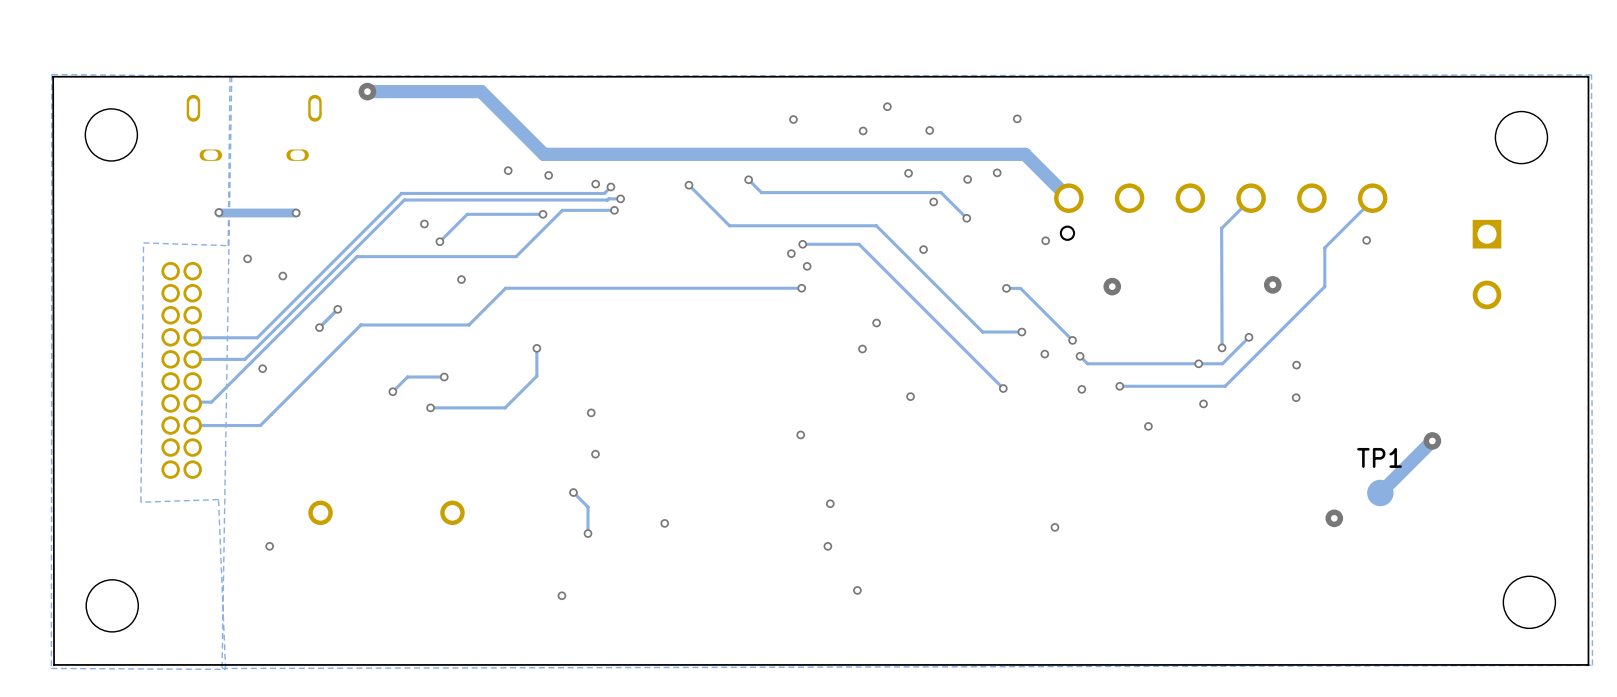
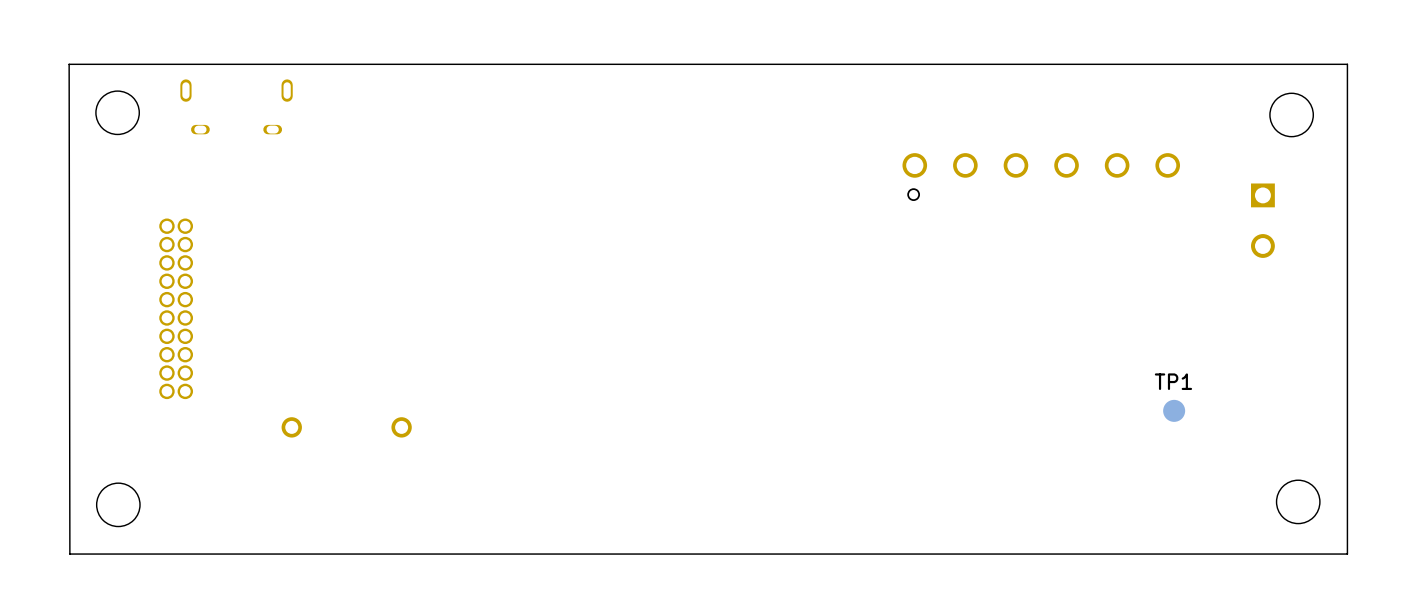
zone outline: (51, 74) (230, 76) (228, 245) (143, 242) (140, 502) (218, 499) (225, 669) (51, 668) (51, 74) -> none
zone outline: (1591, 74) (1592, 665) (222, 668) (231, 76) (1591, 74) -> none
track: (367, 91) (481, 91) (543, 154) (1025, 154) (1068, 198) -> none
via: (367, 91) -> none
via: (887, 106) -> none
via: (1017, 118) -> none
via: (793, 119) -> none
via: (863, 130) -> none
via: (929, 130) -> none
via: (508, 170) -> none
via: (997, 172) -> none
via: (908, 173) -> none
via: (548, 175) -> none
track: (748, 179) (761, 192) (941, 192) (966, 218) -> none
via: (748, 179) -> none
via: (967, 179) -> none
via: (595, 184) -> none
track: (688, 185) (729, 225) (876, 225) (982, 332) (1021, 332) -> none
via: (688, 185) -> none
track: (610, 186) (604, 193) (401, 193) (257, 337) (192, 337) -> none
via: (610, 186) -> none
track: (620, 198) (607, 200) -> none
via: (620, 198) -> none
track: (1373, 199) (1324, 247) (1324, 286) (1225, 386) (1119, 386) -> none
track: (607, 200) (404, 200) (244, 359) (194, 359) -> none
track: (1249, 200) (1221, 228) (1222, 347) -> none
via: (933, 201) -> none
track: (614, 210) (562, 210) (516, 256) (356, 256) (211, 402) (196, 402) -> none
via: (614, 210) -> none
track: (218, 212) (296, 212) -> none
via: (218, 212) -> none
via: (296, 212) -> none
track: (543, 214) (467, 214) (439, 241) -> none
via: (543, 214) -> none
via: (966, 218) -> none
via: (424, 224) -> none
via: (1045, 240) -> none
via: (1366, 240) -> none
via: (439, 241) -> none
track: (802, 244) (859, 244) (1003, 388) -> none
via: (802, 244) -> none
via: (923, 249) -> none
via: (791, 253) -> none
via: (247, 258) -> none
via: (807, 266) -> none
via: (282, 276) -> none
via: (461, 279) -> none
via: (1272, 284) -> none
via: (1112, 286) -> none
track: (801, 288) (505, 288) (468, 324) (360, 324) (260, 425) (192, 425) -> none
via: (801, 288) -> none
track: (1006, 288) (1020, 288) (1072, 340) -> none
via: (1006, 288) -> none
track: (337, 309) (319, 327) -> none
via: (337, 309) -> none
via: (876, 323) -> none
via: (319, 327) -> none
via: (1021, 332) -> none
track: (1248, 337) (1222, 363) (1087, 363) (1080, 356) -> none
via: (1248, 337) -> none
via: (1072, 340) -> none
via: (1222, 347) -> none
track: (536, 348) (536, 376) (505, 407) (430, 407) -> none
via: (536, 348) -> none
via: (862, 349) -> none
via: (1044, 354) -> none
via: (1080, 356) -> none
via: (1198, 363) -> none
via: (1296, 365) -> none
via: (262, 368) -> none
track: (444, 377) (407, 377) (392, 391) -> none
via: (444, 377) -> none
via: (1119, 386) -> none
via: (1003, 388) -> none
via: (1081, 389) -> none
via: (392, 391) -> none
via: (910, 396) -> none
via: (1296, 397) -> none
via: (1203, 403) -> none
via: (430, 407) -> none
via: (591, 412) -> none
via: (1148, 426) -> none
via: (800, 434) -> none
track: (1432, 440) (1380, 492) -> none
via: (1432, 440) -> none
via: (595, 454) -> none
track: (573, 492) (588, 507) (588, 533) -> none
via: (573, 492) -> none
via: (830, 503) -> none
via: (1334, 518) -> none
via: (664, 523) -> none
via: (1054, 527) -> none
via: (588, 533) -> none
via: (269, 546) -> none
via: (827, 546) -> none
via: (857, 590) -> none
via: (561, 595) -> none

